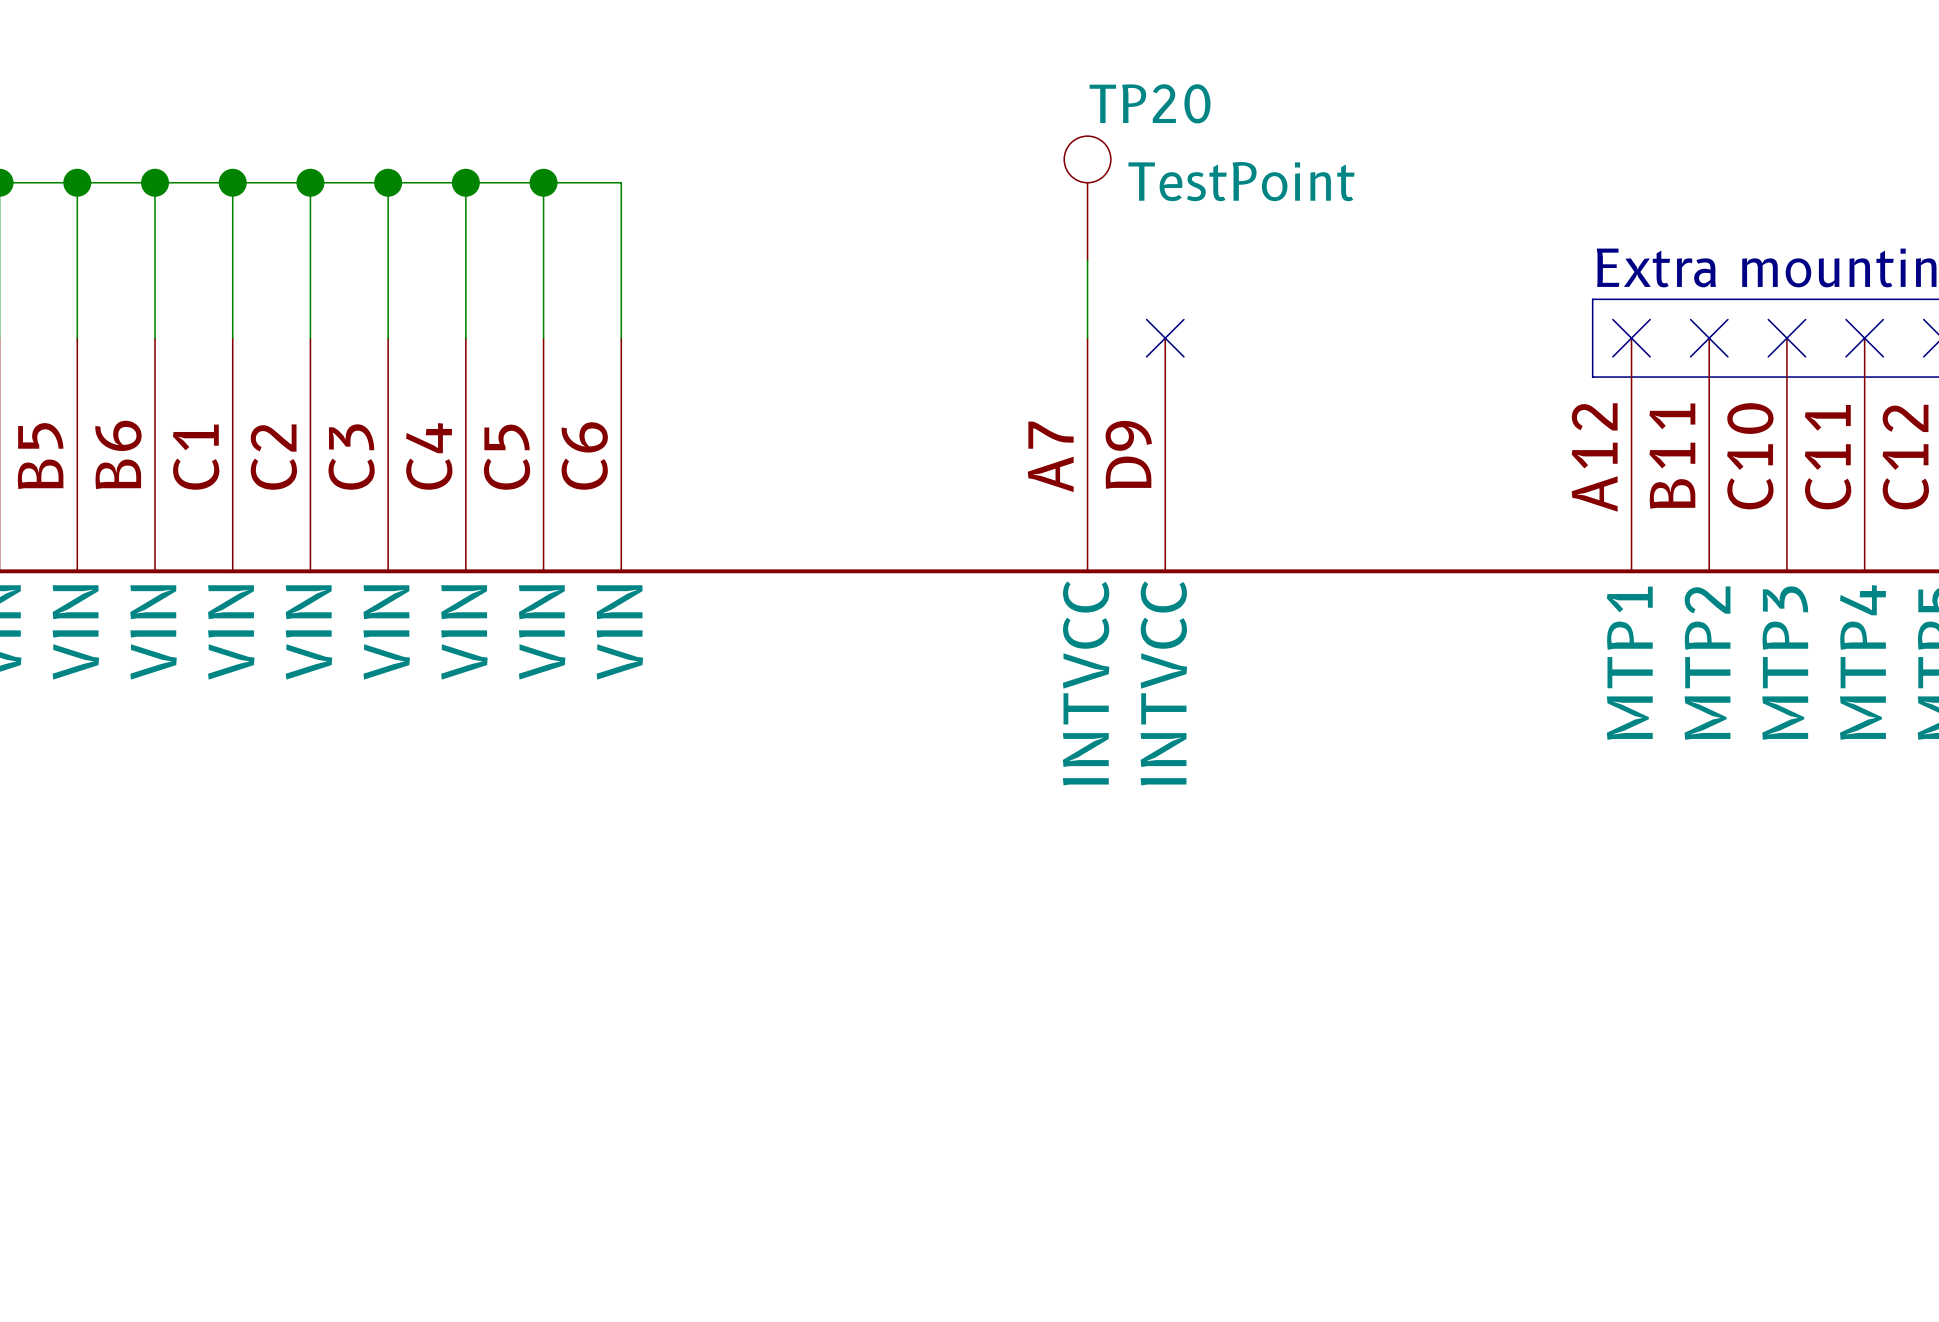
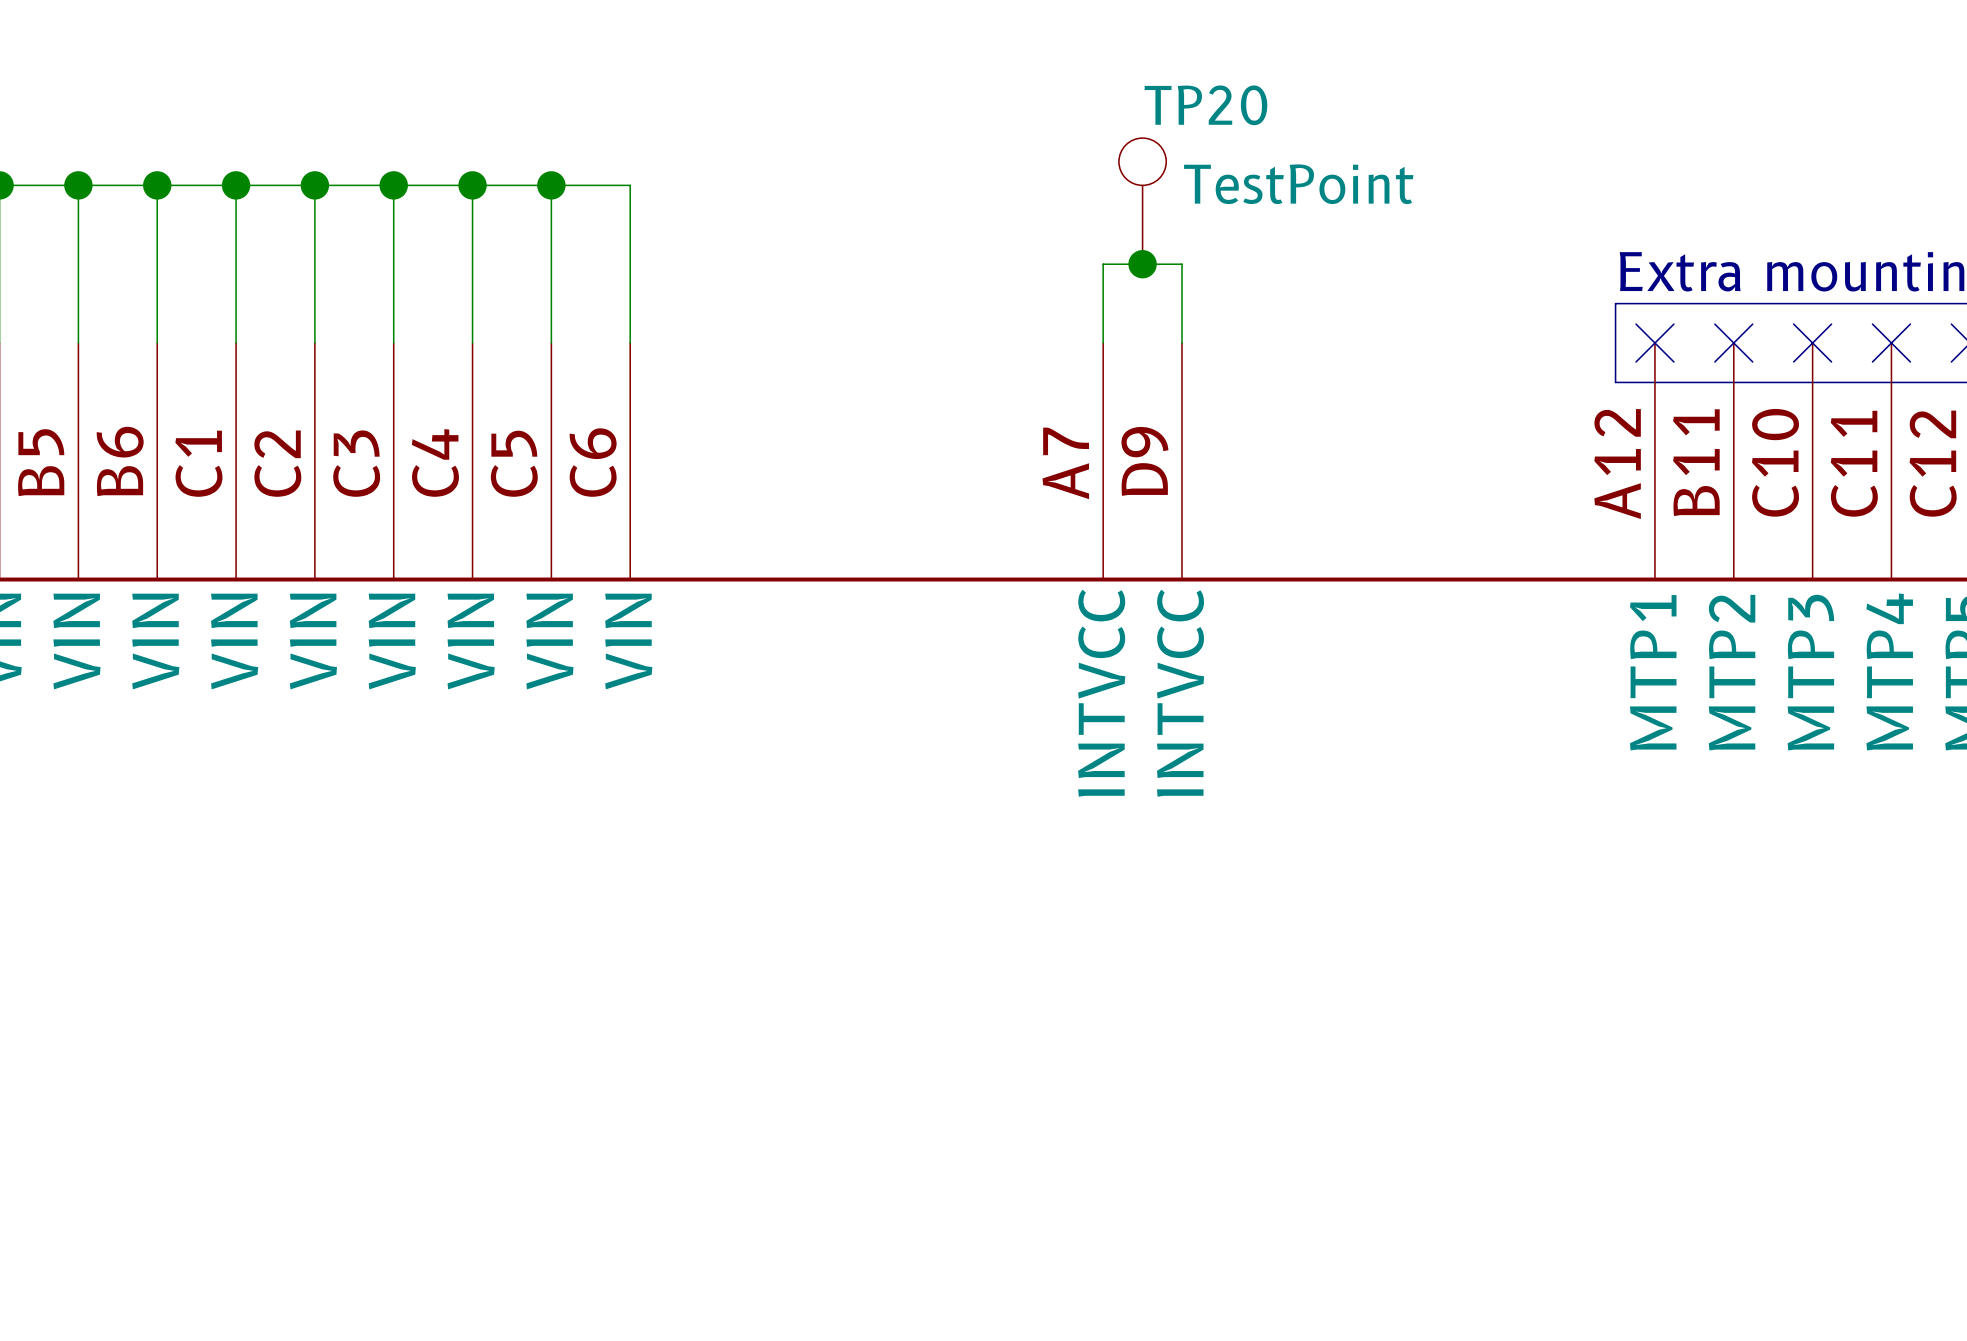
TP20 position: (1087, 198) -> (1142, 201)
wire: none -> (1103, 264) (1182, 264) (1182, 343)
junction: none -> (1142, 264)
no-connect mark: (1165, 338) -> none

